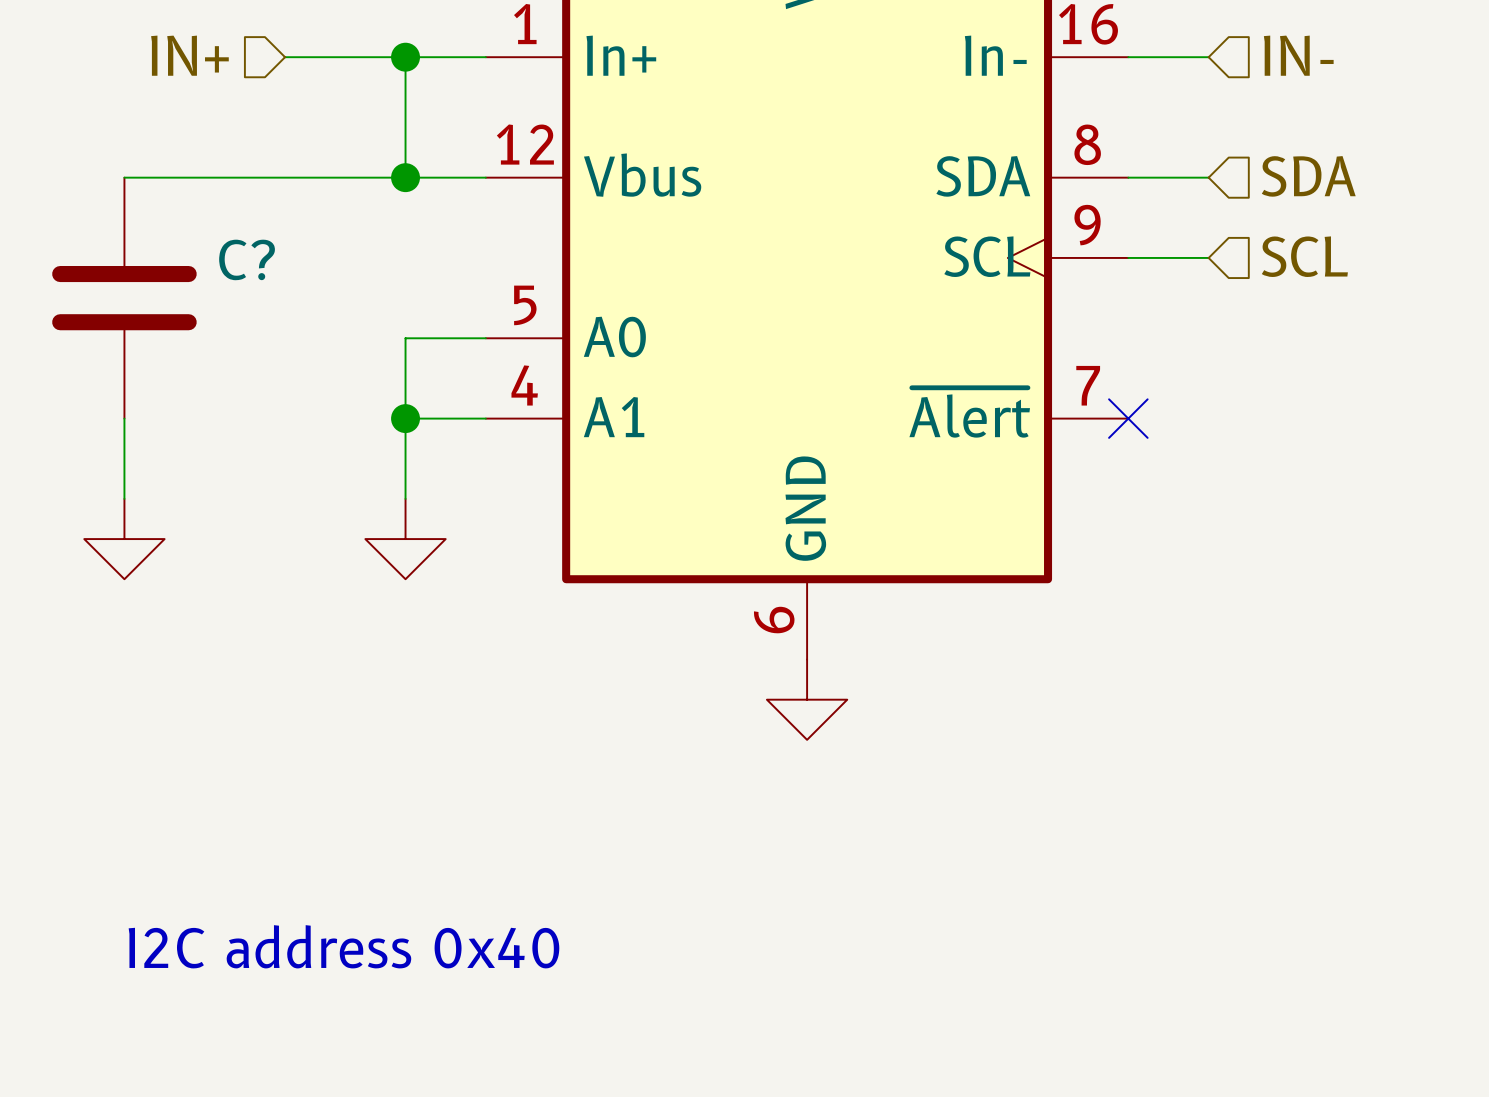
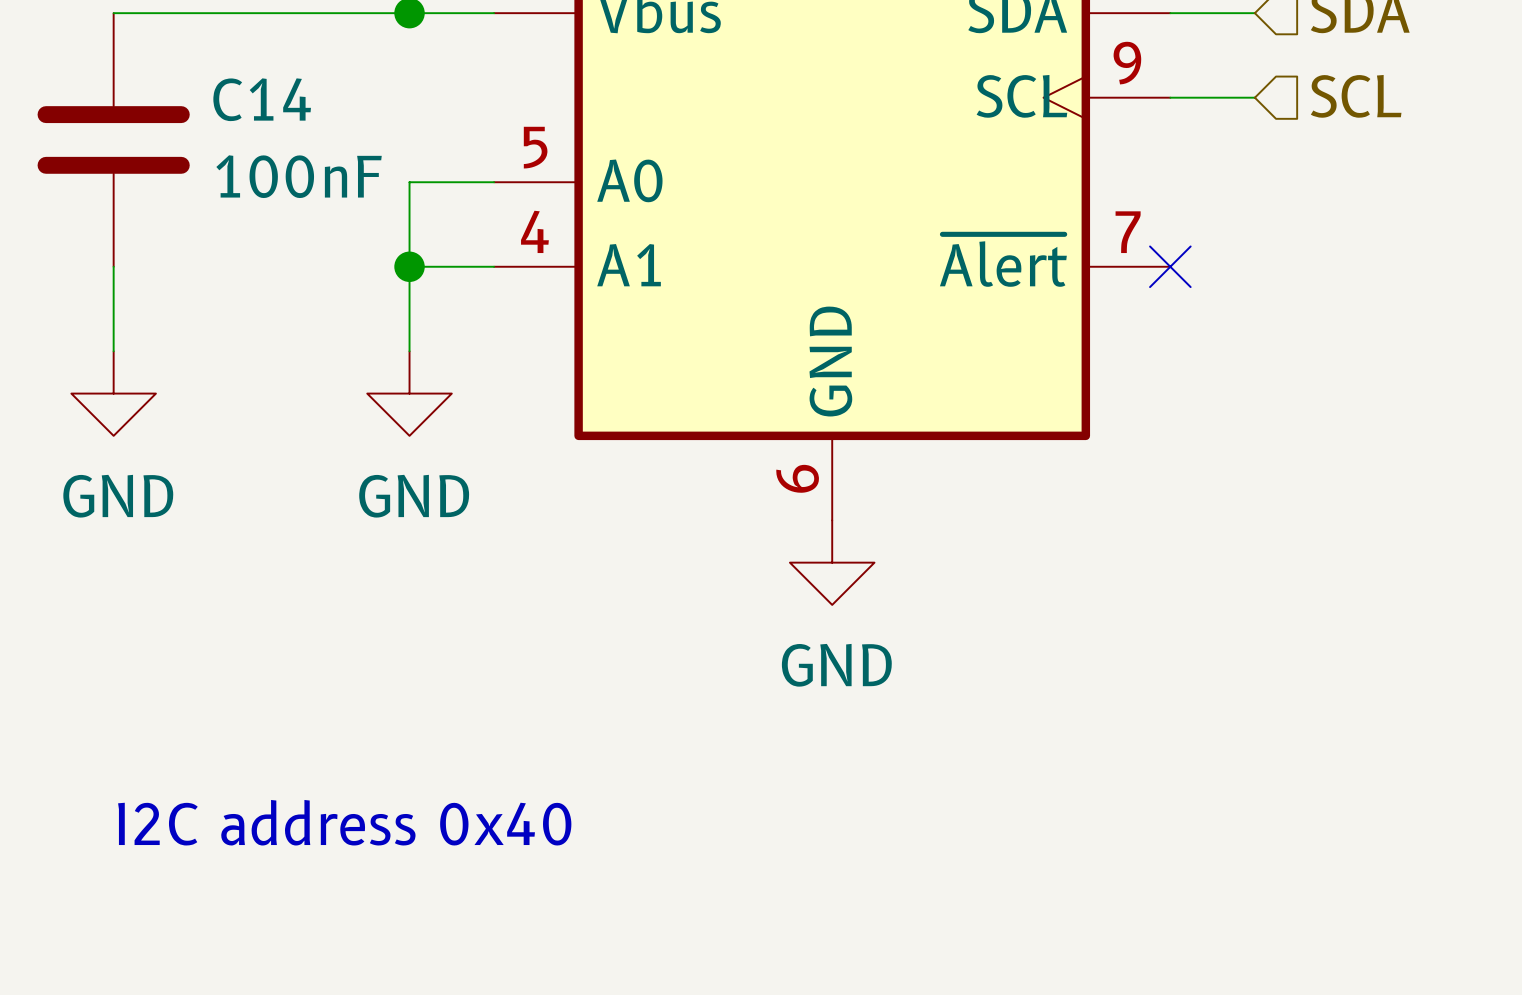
C? name: C? (247, 259) -> C14 (262, 99)
C? value: none -> 100nF (299, 176)
power symbol text: none -> GND (118, 496)
power symbol text: none -> GND (414, 496)
power symbol text: none -> GND (836, 665)

